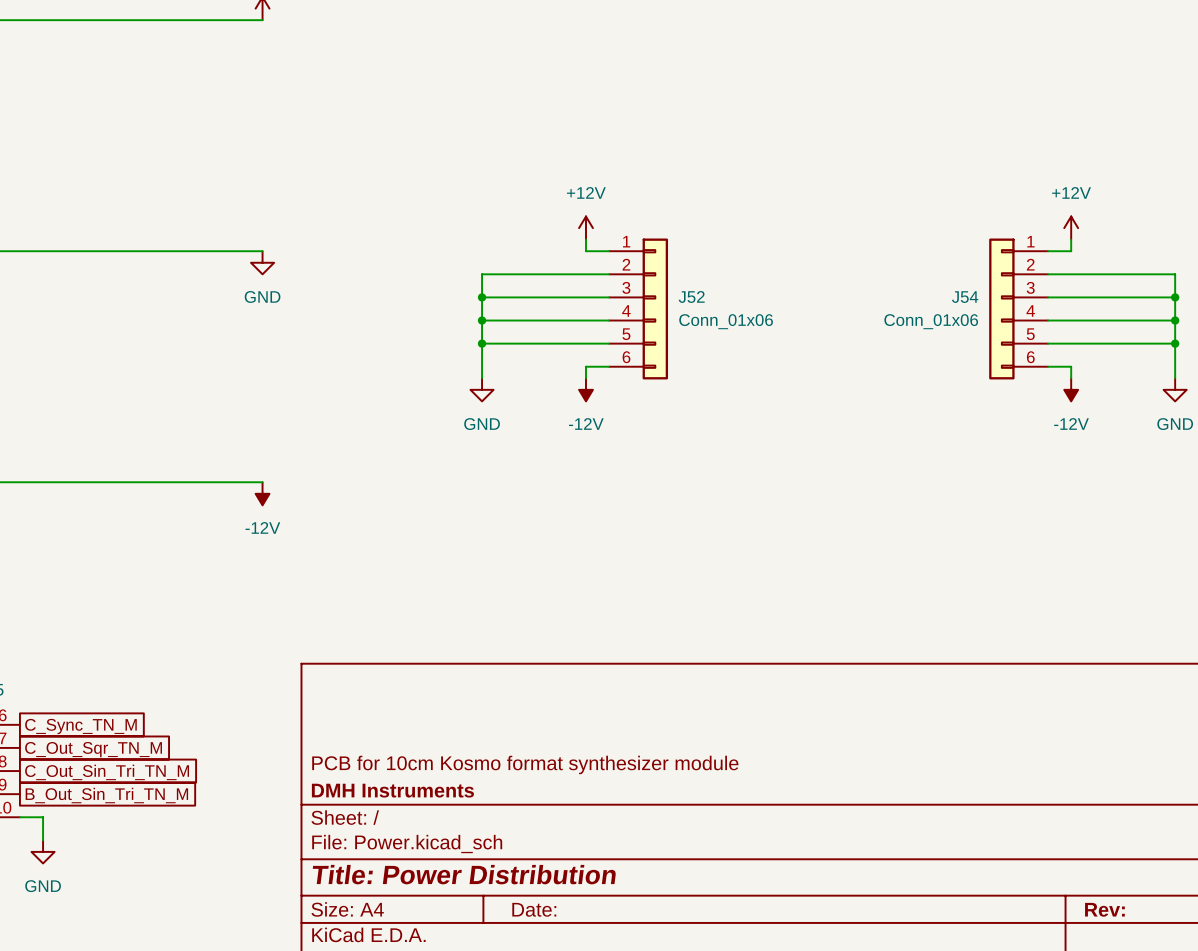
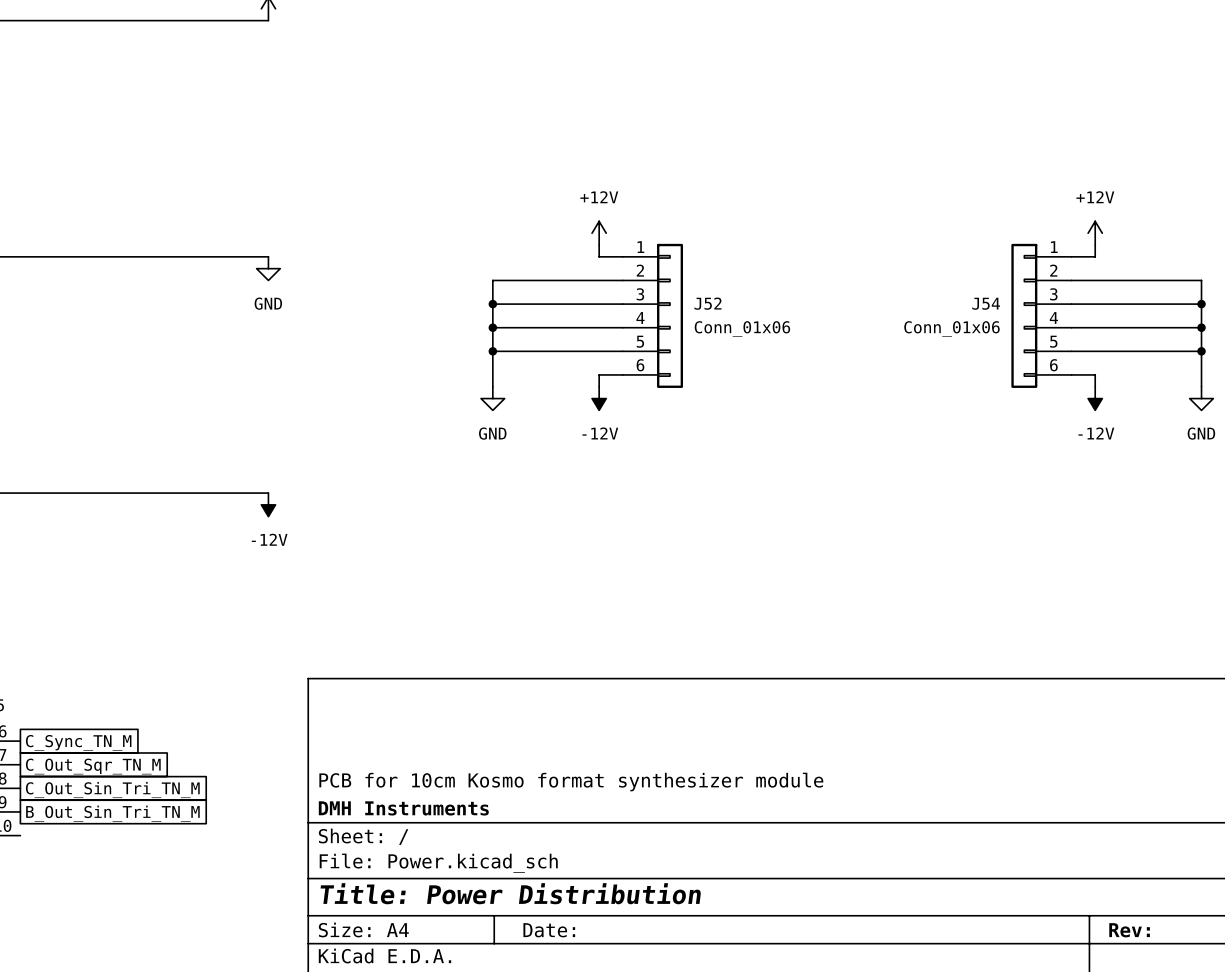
wire: (19, 817) (43, 817) (43, 840) -> none
power symbol: GND (43, 851) -> none

